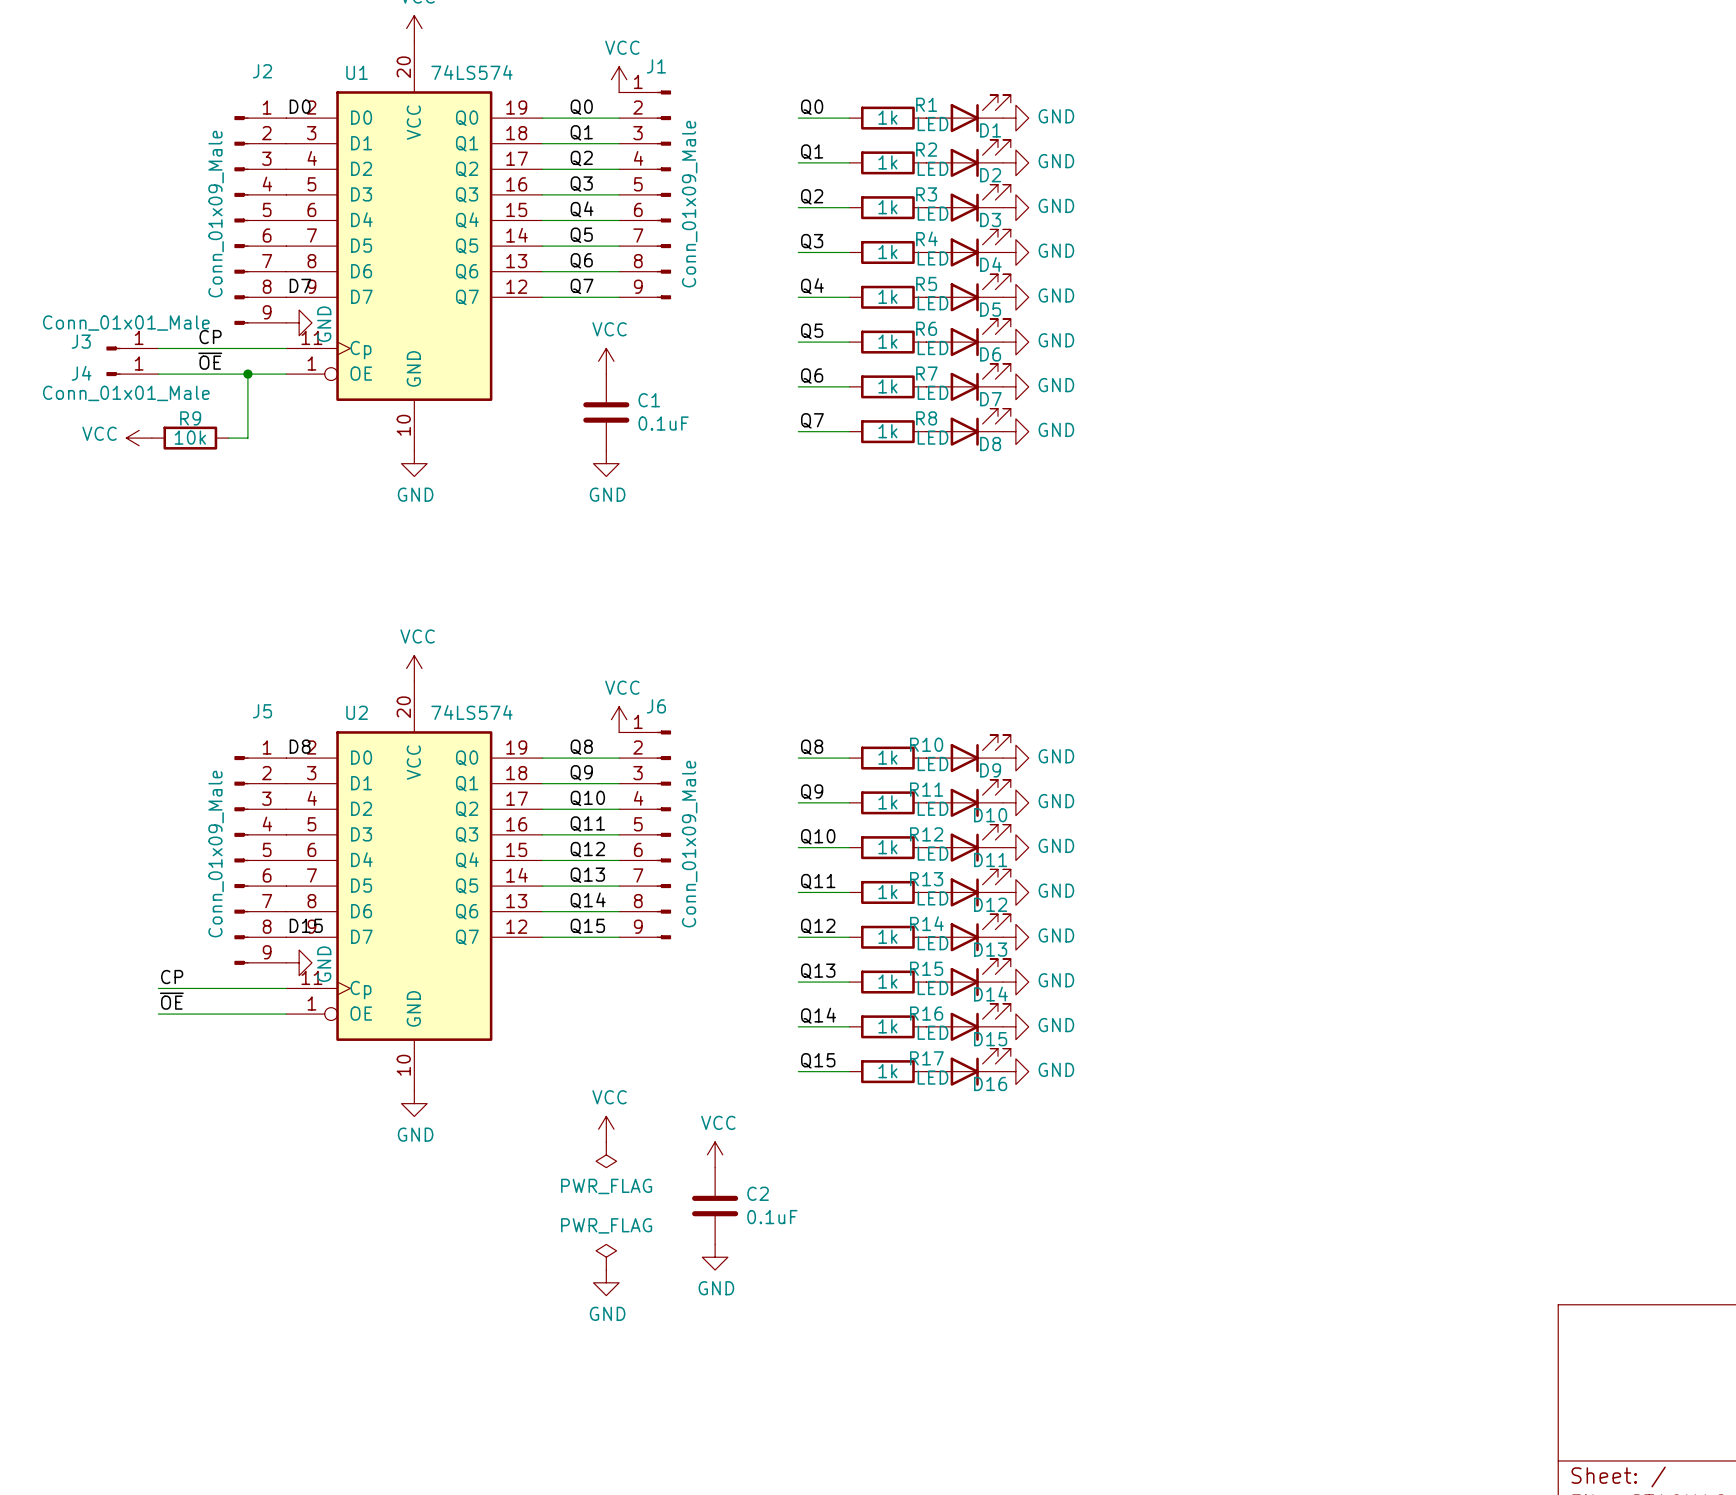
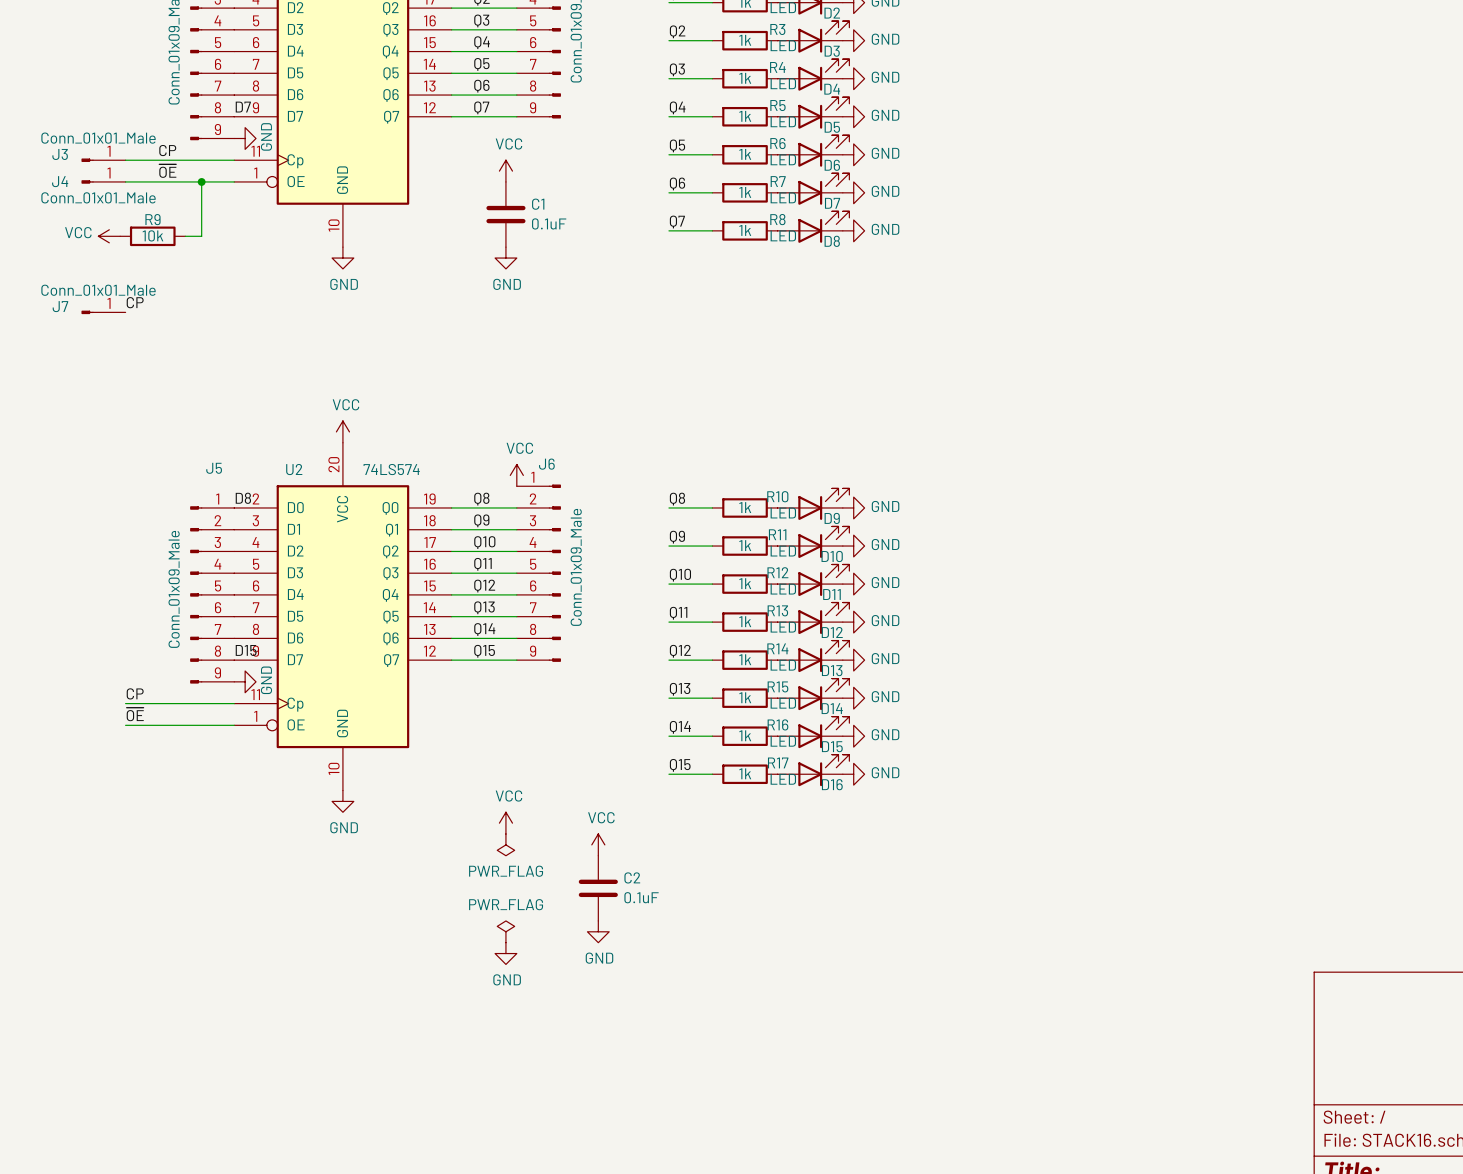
label: none -> CP (135, 302)
J7: none -> Conn_01x01_Male (103, 312)

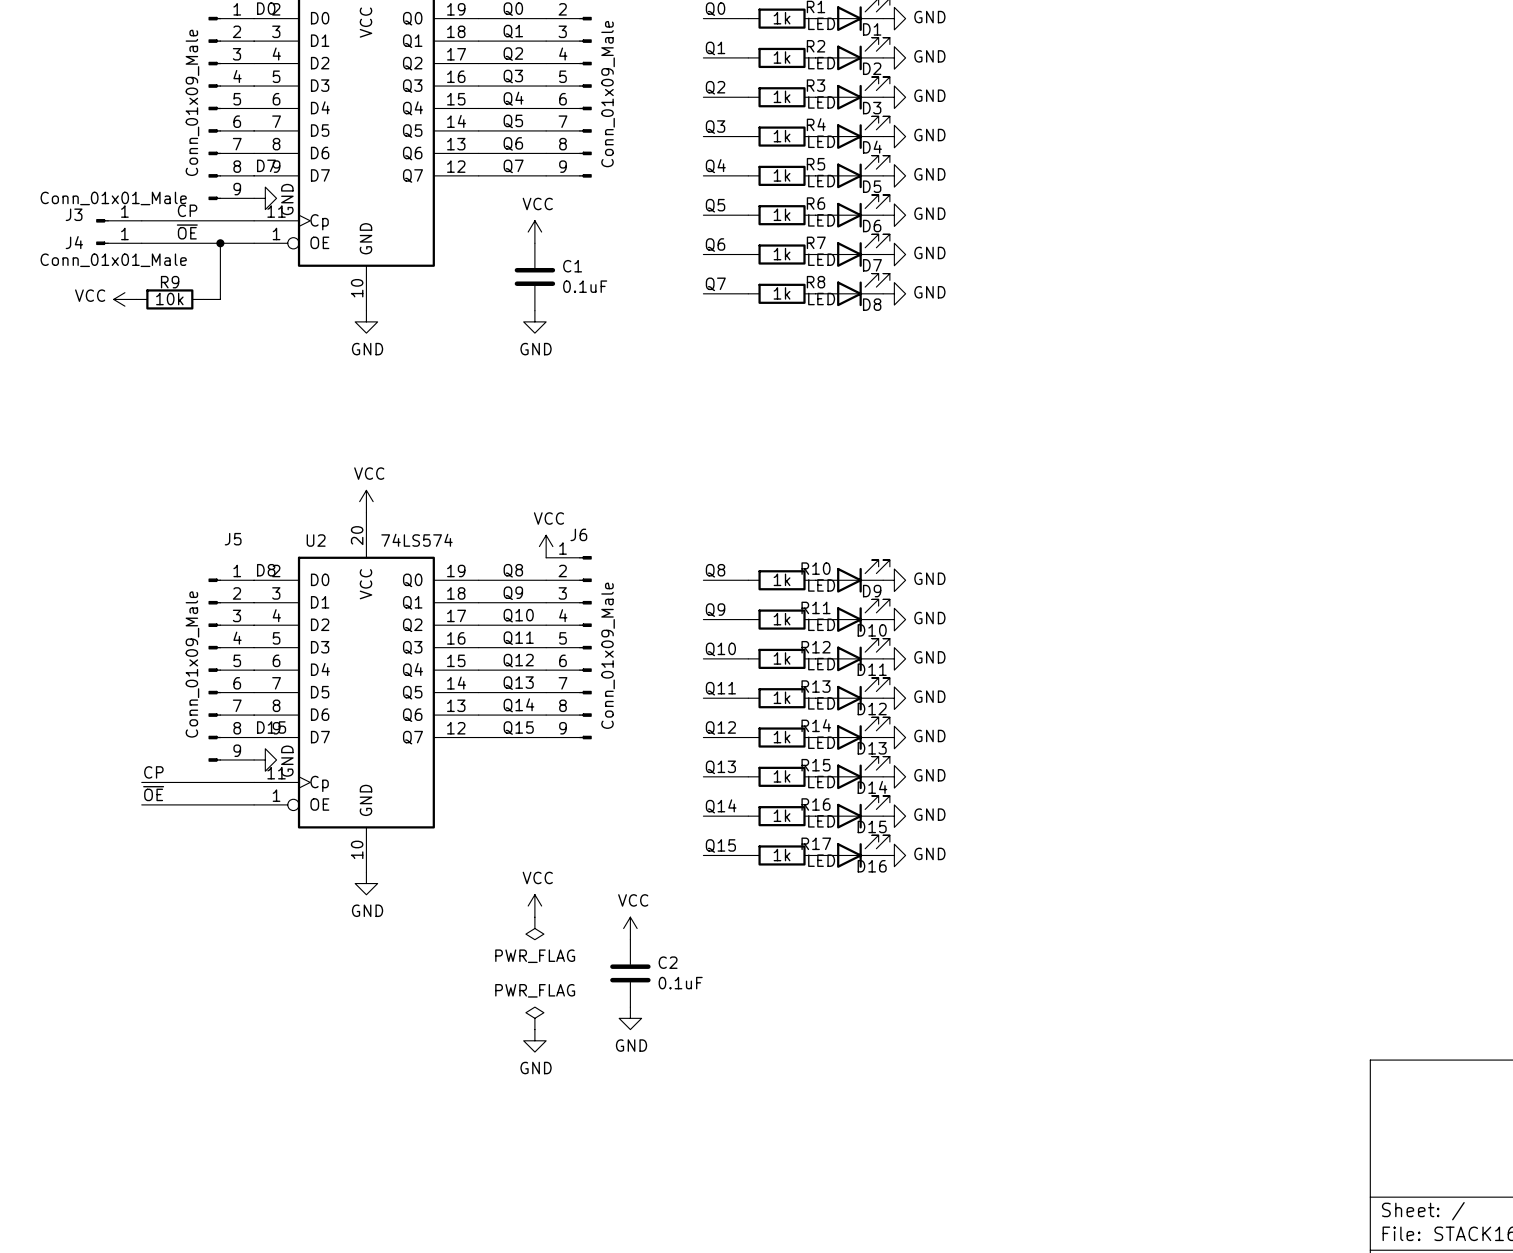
label: CP (135, 302) -> none
J7: Conn_01x01_Male (103, 312) -> none

